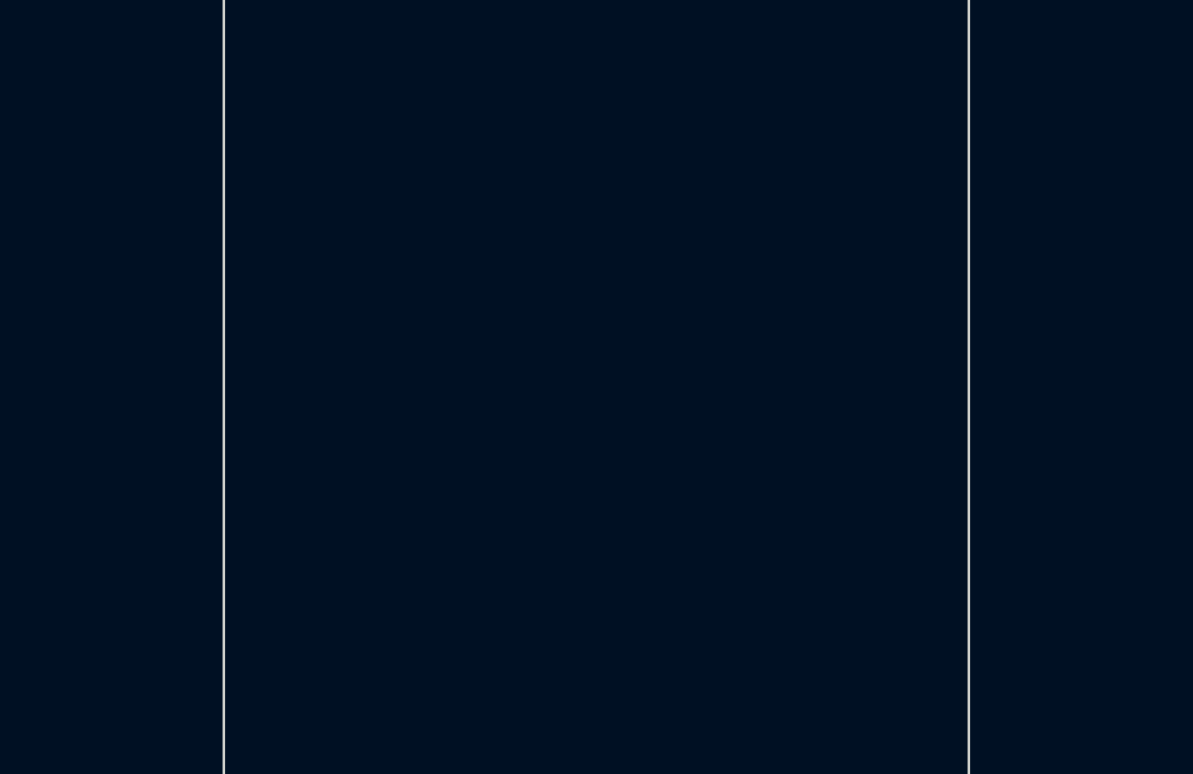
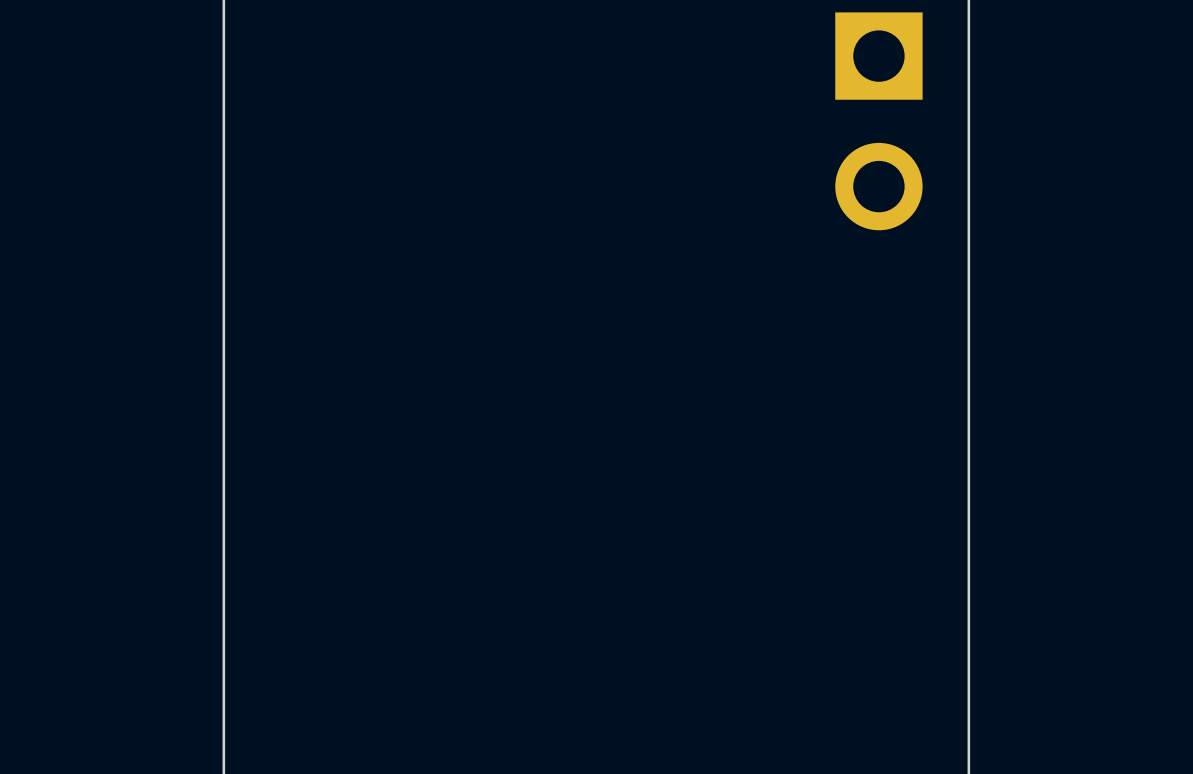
part: none -> (878, 121)

